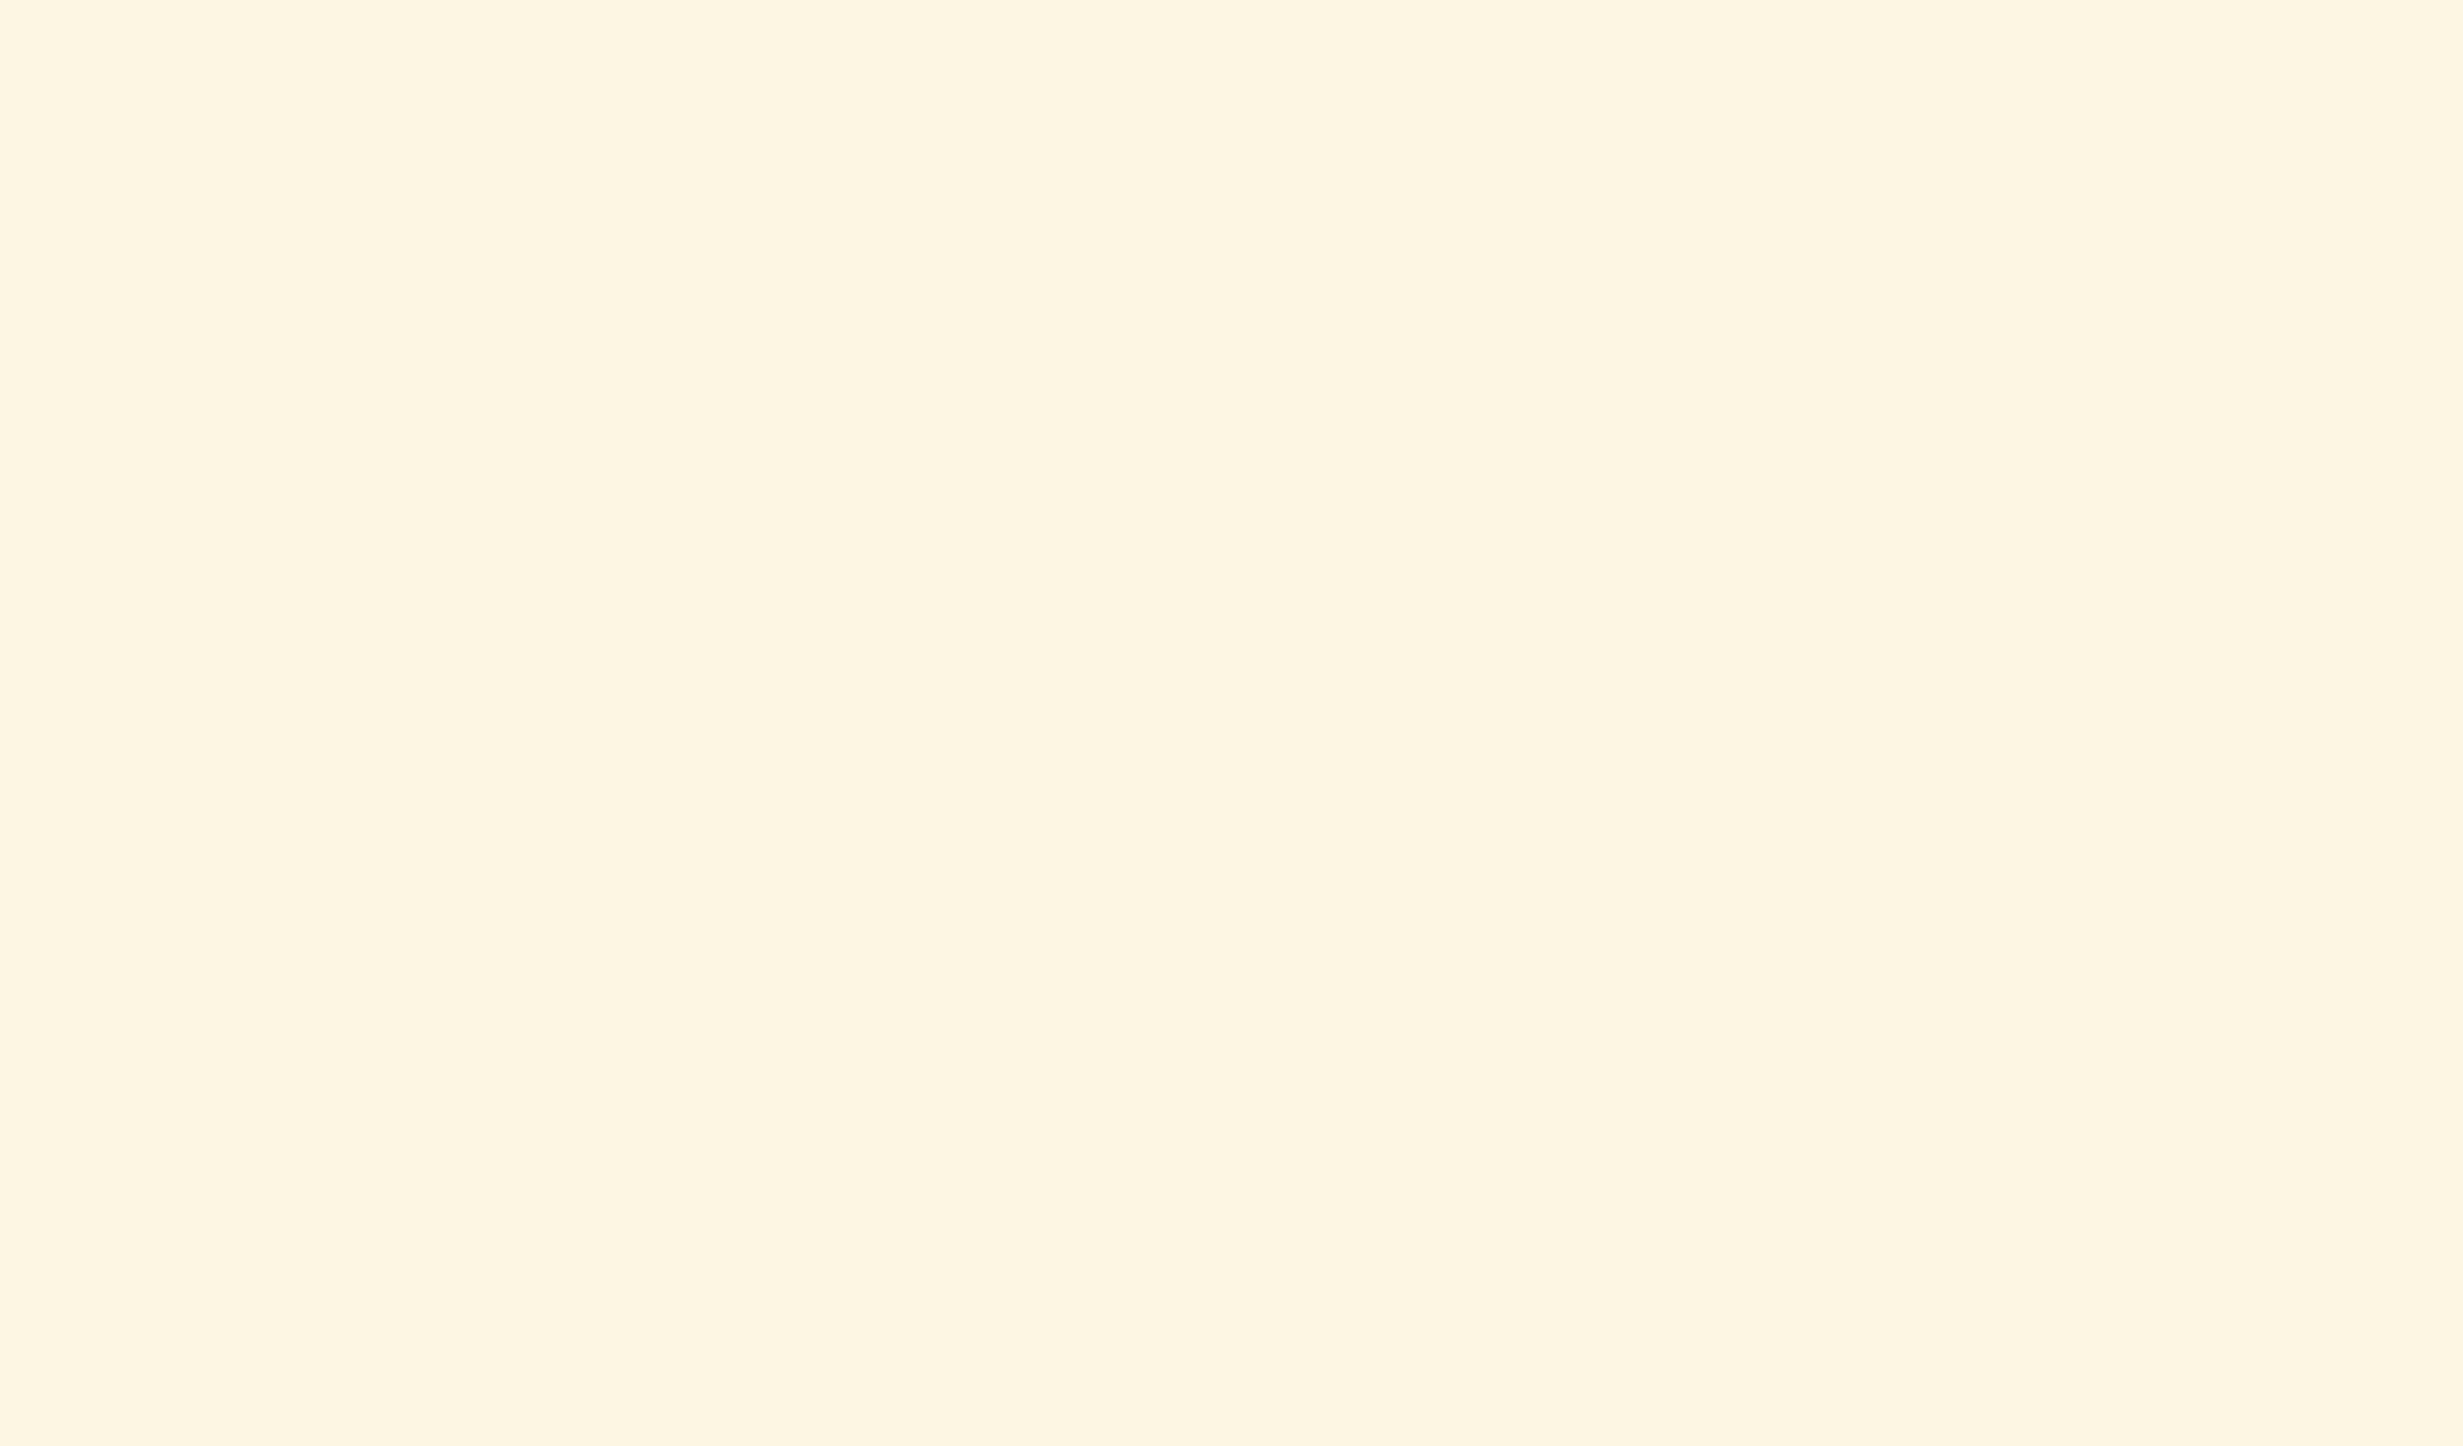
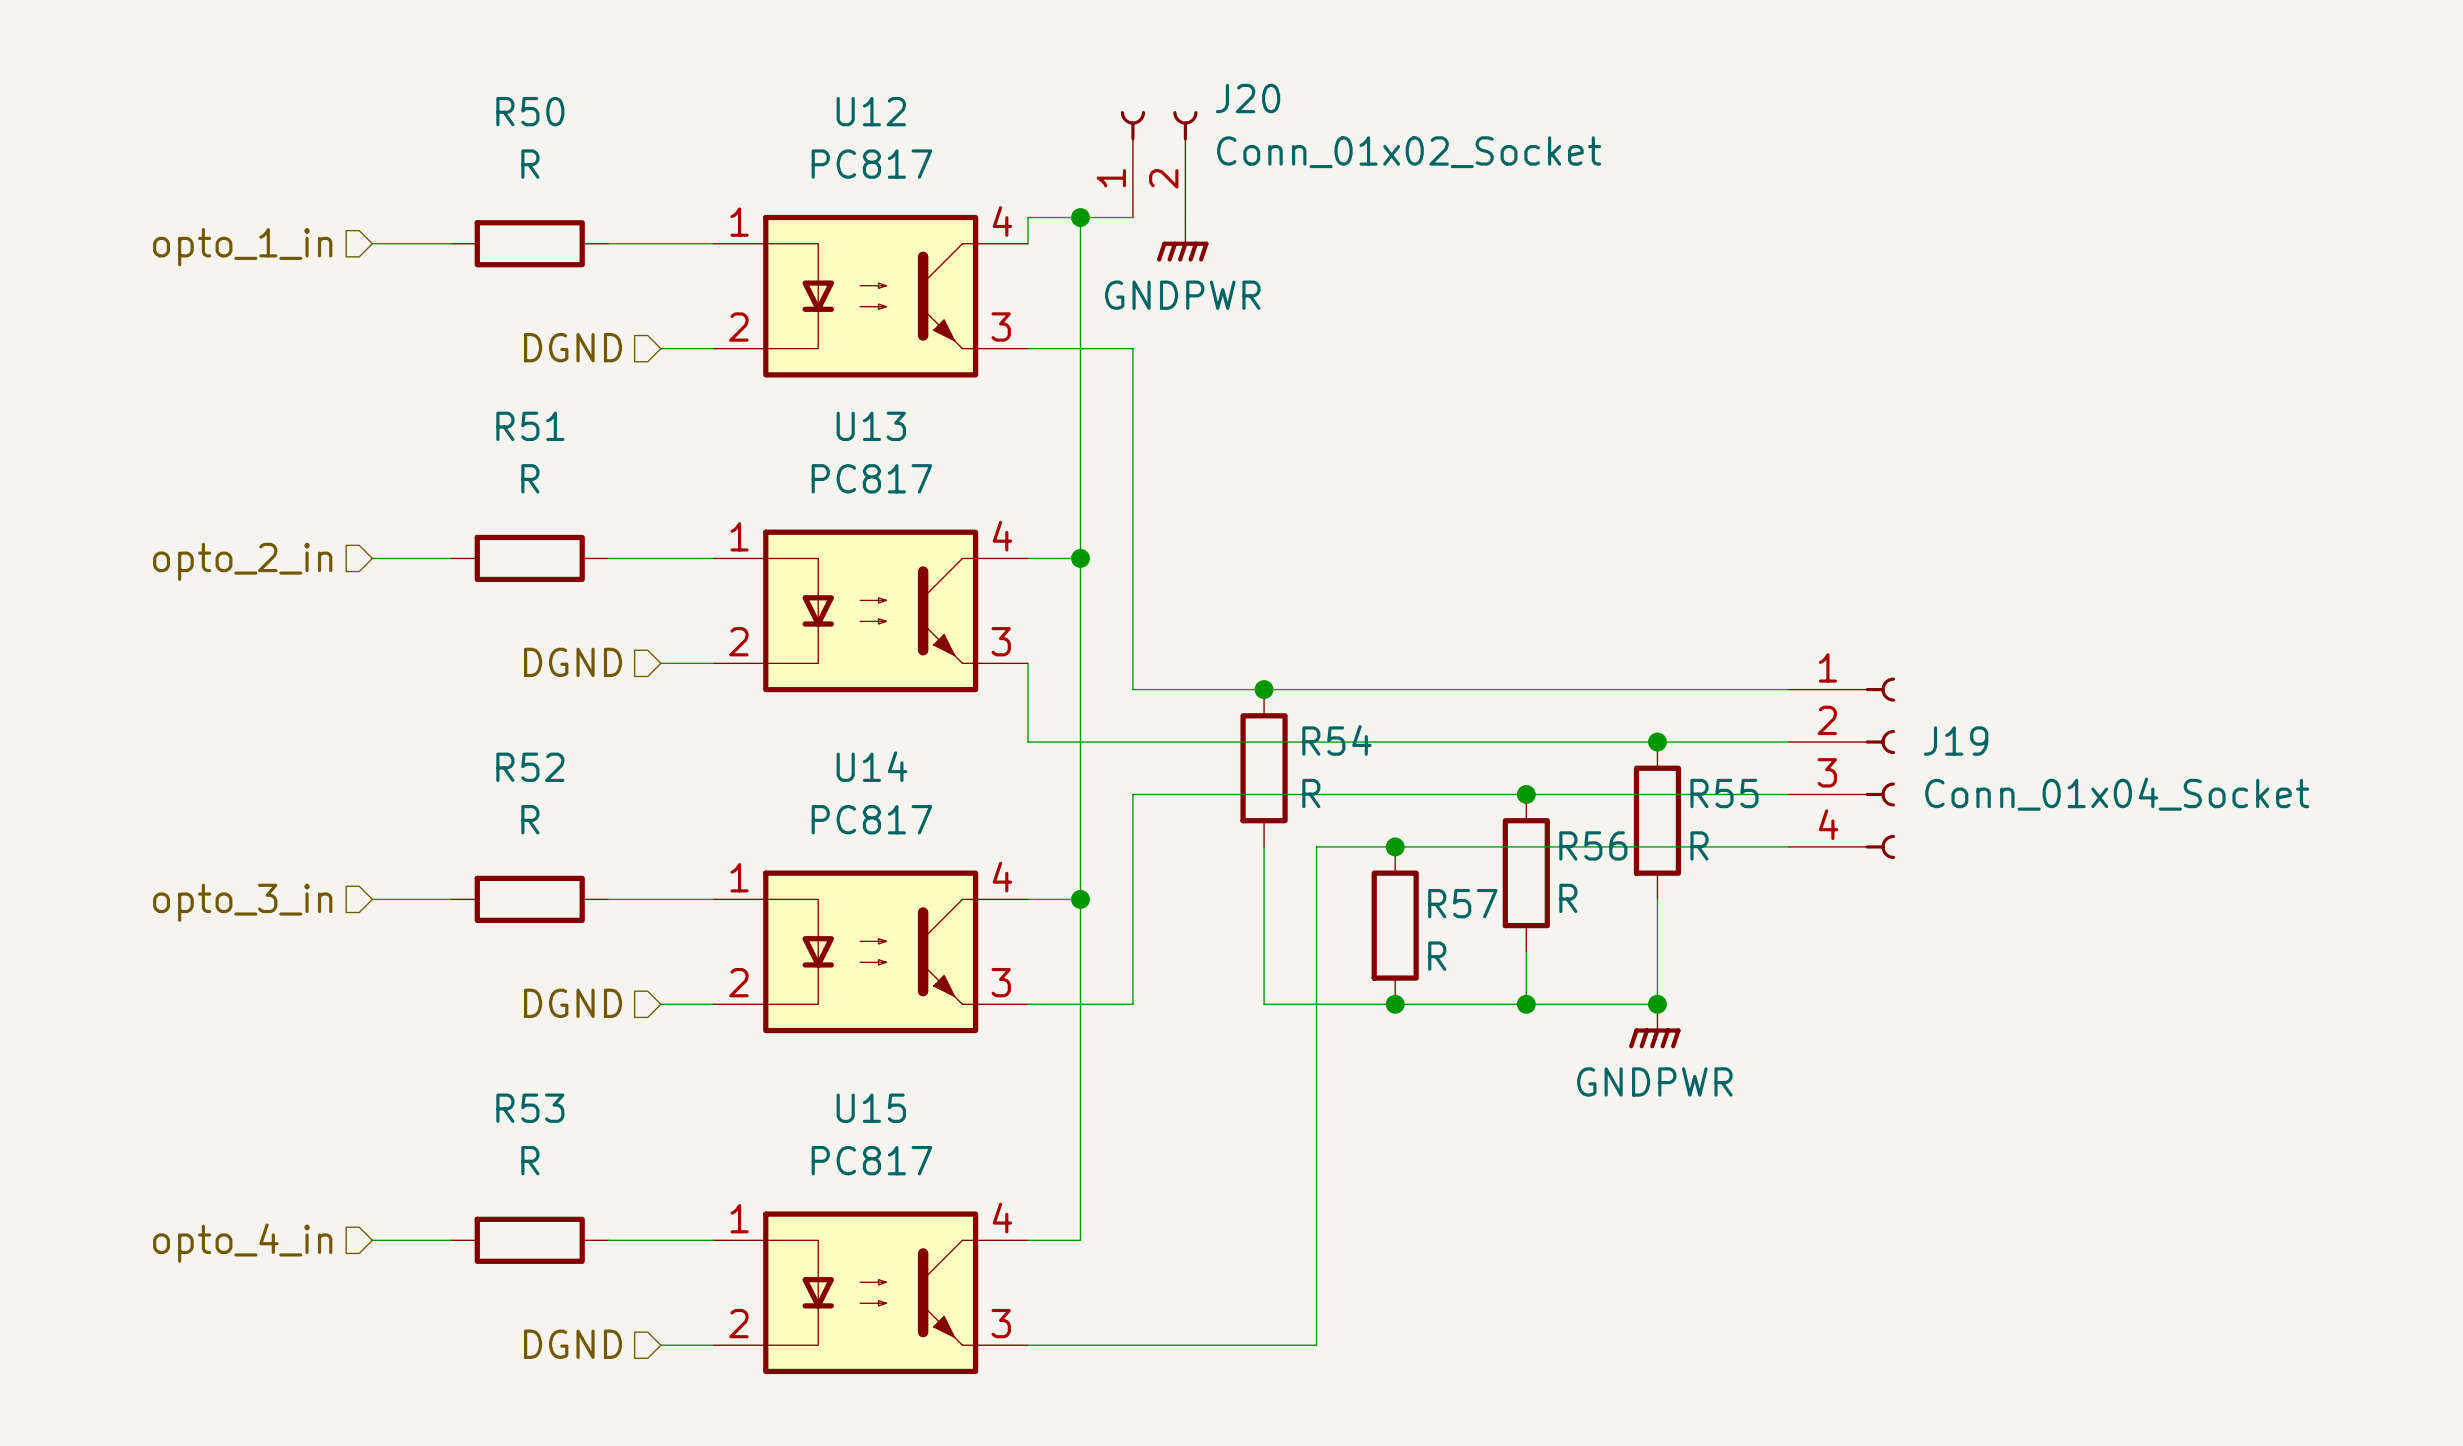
J20: none -> Conn_01x02_Socket (1159, 164)
wire: none -> (1080, 217) (1080, 1240) (1028, 1240)
junction: none -> (1080, 217)
wire: none -> (1132, 217) (1028, 217) (1028, 243)
power symbol: none -> GNDPWR (1182, 239)
wire: none -> (372, 243) (451, 243)
R50: none -> R (529, 243)
wire: none -> (608, 243) (713, 243)
hierarchical label: none -> opto_1_in (242, 247)
U12: none -> PC817 (870, 296)
hierarchical label: none -> DGND (573, 347)
wire: none -> (660, 348) (713, 348)
wire: none -> (1028, 348) (1132, 348) (1132, 689) (1788, 689)
wire: none -> (372, 558) (451, 558)
R51: none -> R (529, 558)
wire: none -> (608, 558) (713, 558)
wire: none -> (1028, 558) (1080, 558)
junction: none -> (1080, 558)
hierarchical label: none -> opto_2_in (242, 561)
U13: none -> PC817 (870, 610)
hierarchical label: none -> DGND (573, 662)
wire: none -> (660, 663) (713, 663)
wire: none -> (1028, 663) (1028, 742) (1788, 742)
junction: none -> (1264, 689)
junction: none -> (1657, 742)
R54: none -> R (1264, 768)
J19: none -> Conn_01x04_Socket (1841, 768)
junction: none -> (1526, 794)
wire: none -> (1788, 794) (1132, 794) (1132, 1004) (1028, 1004)
R55: none -> R (1657, 820)
wire: none -> (1264, 846) (1264, 1004) (1657, 1004) (1657, 899)
junction: none -> (1395, 846)
wire: none -> (1788, 846) (1316, 846) (1316, 1345) (1028, 1345)
R56: none -> R (1526, 873)
wire: none -> (372, 899) (451, 899)
R52: none -> R (529, 899)
wire: none -> (608, 899) (713, 899)
wire: none -> (1028, 899) (1080, 899)
junction: none -> (1080, 899)
hierarchical label: none -> opto_3_in (242, 902)
R57: none -> R (1395, 925)
U14: none -> PC817 (870, 951)
wire: none -> (1526, 951) (1526, 1004)
hierarchical label: none -> DGND (573, 1003)
wire: none -> (660, 1004) (713, 1004)
junction: none -> (1395, 1004)
junction: none -> (1526, 1004)
junction: none -> (1657, 1004)
power symbol: none -> GNDPWR (1654, 1026)
wire: none -> (372, 1240) (451, 1240)
R53: none -> R (529, 1240)
wire: none -> (608, 1240) (713, 1240)
hierarchical label: none -> opto_4_in (242, 1243)
U15: none -> PC817 (870, 1292)
hierarchical label: none -> DGND (573, 1344)
wire: none -> (660, 1345) (713, 1345)

